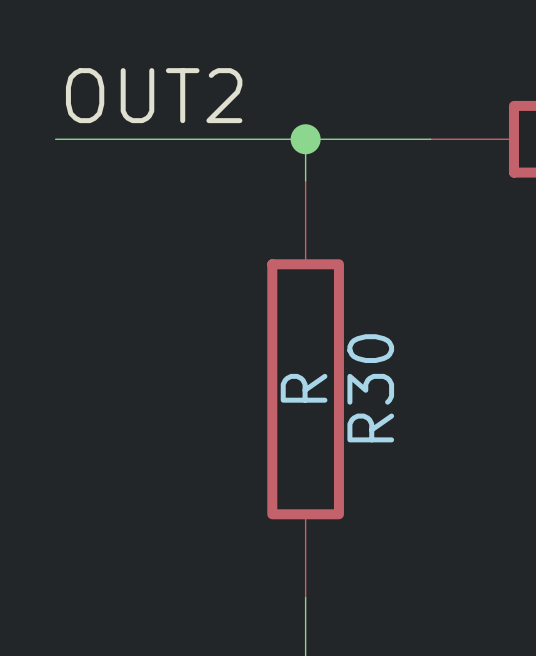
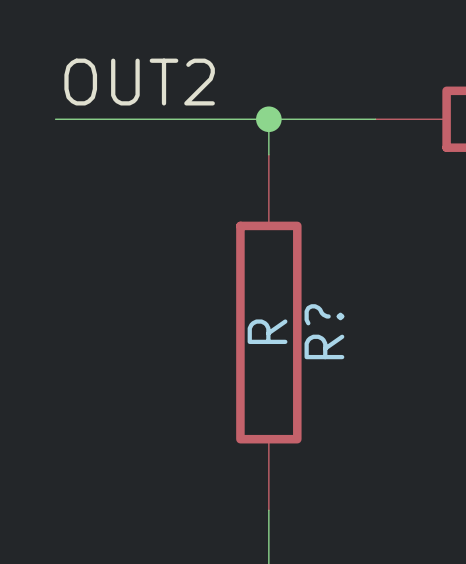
R30 name: R30 (370, 388) -> R? (324, 331)

